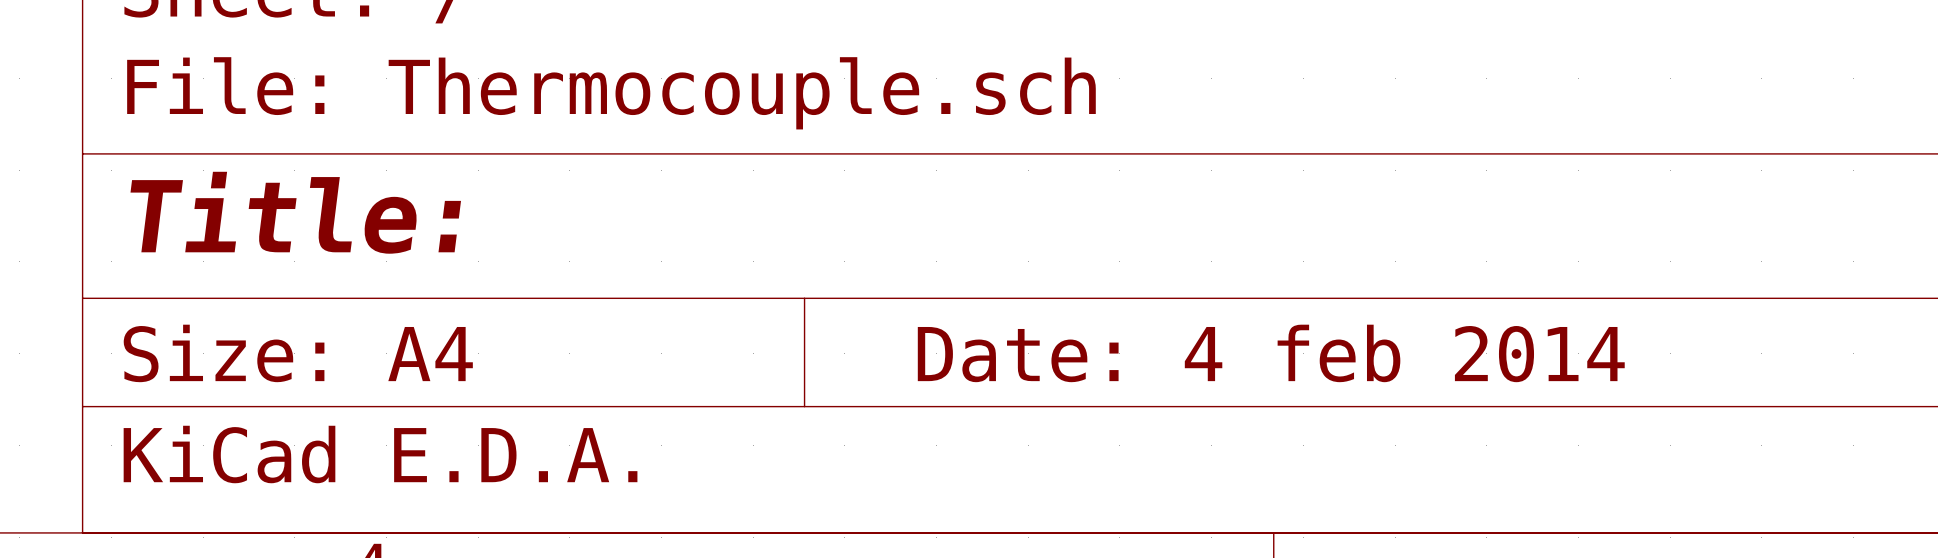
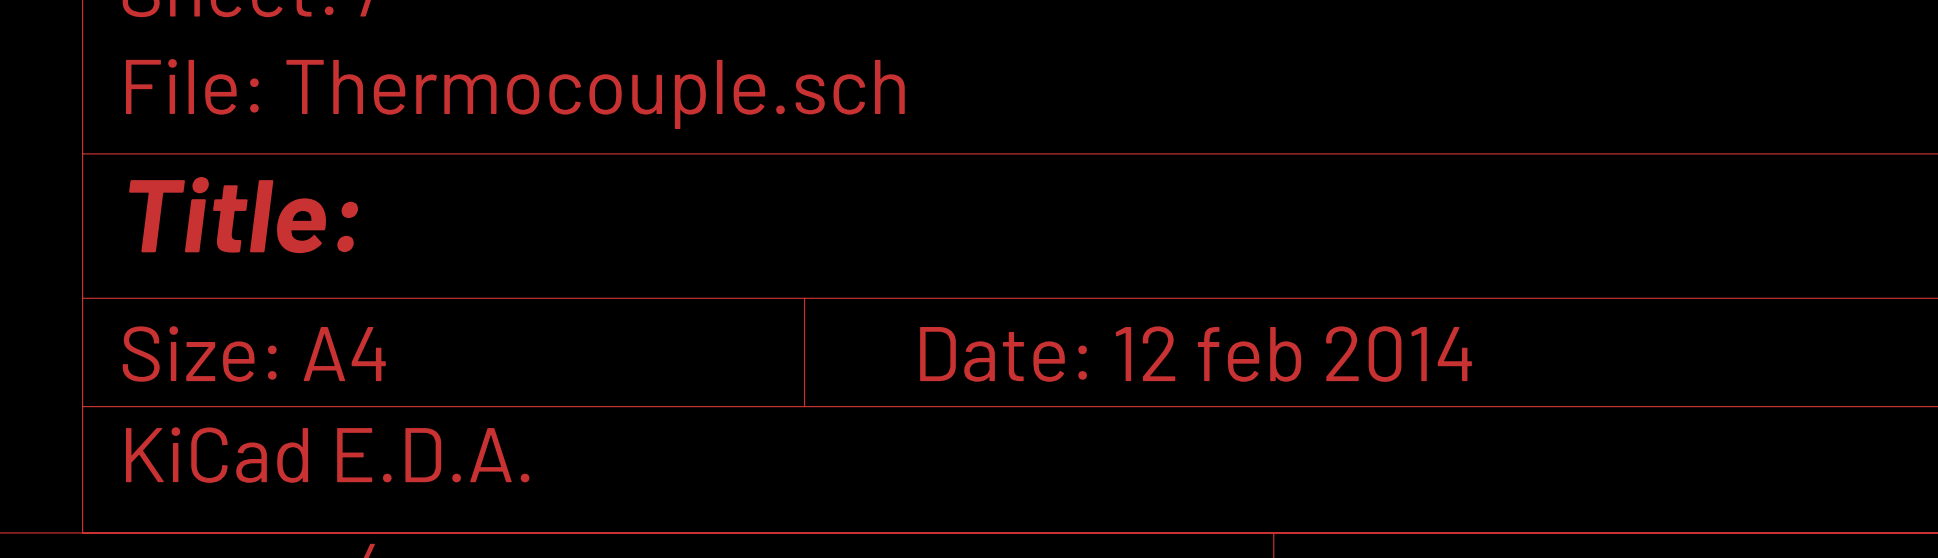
title block: Date: 4 feb 2014 (1271, 353) -> Date: 12 feb 2014 (1196, 354)

